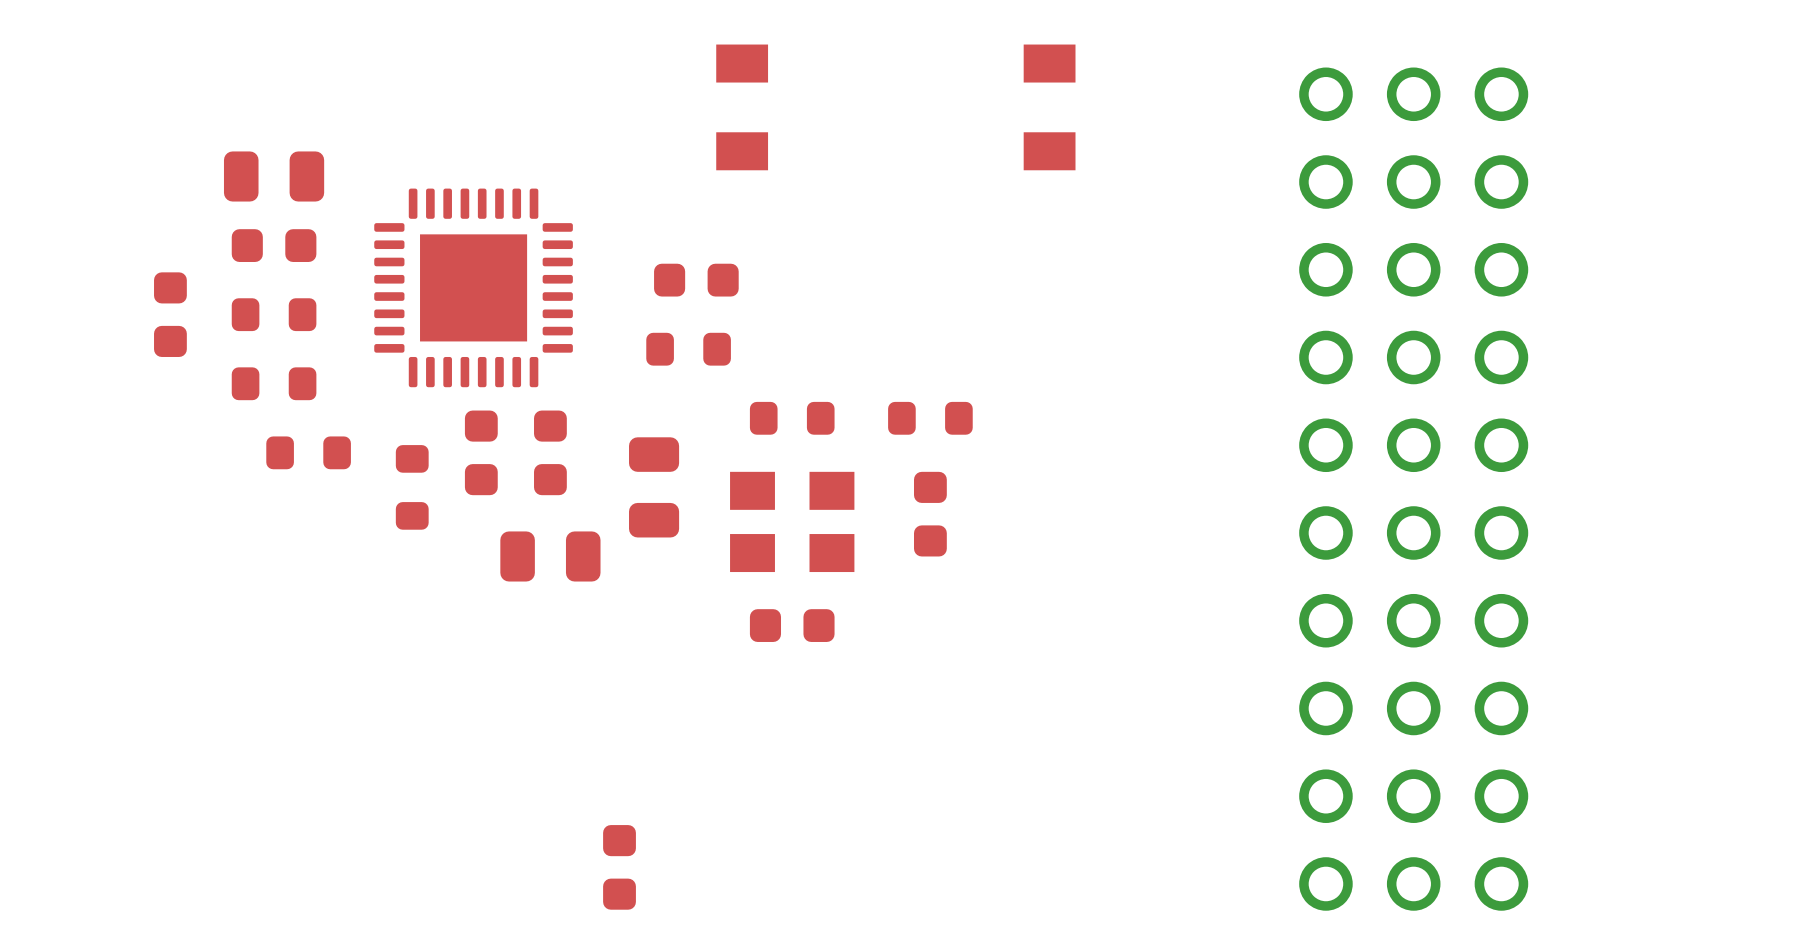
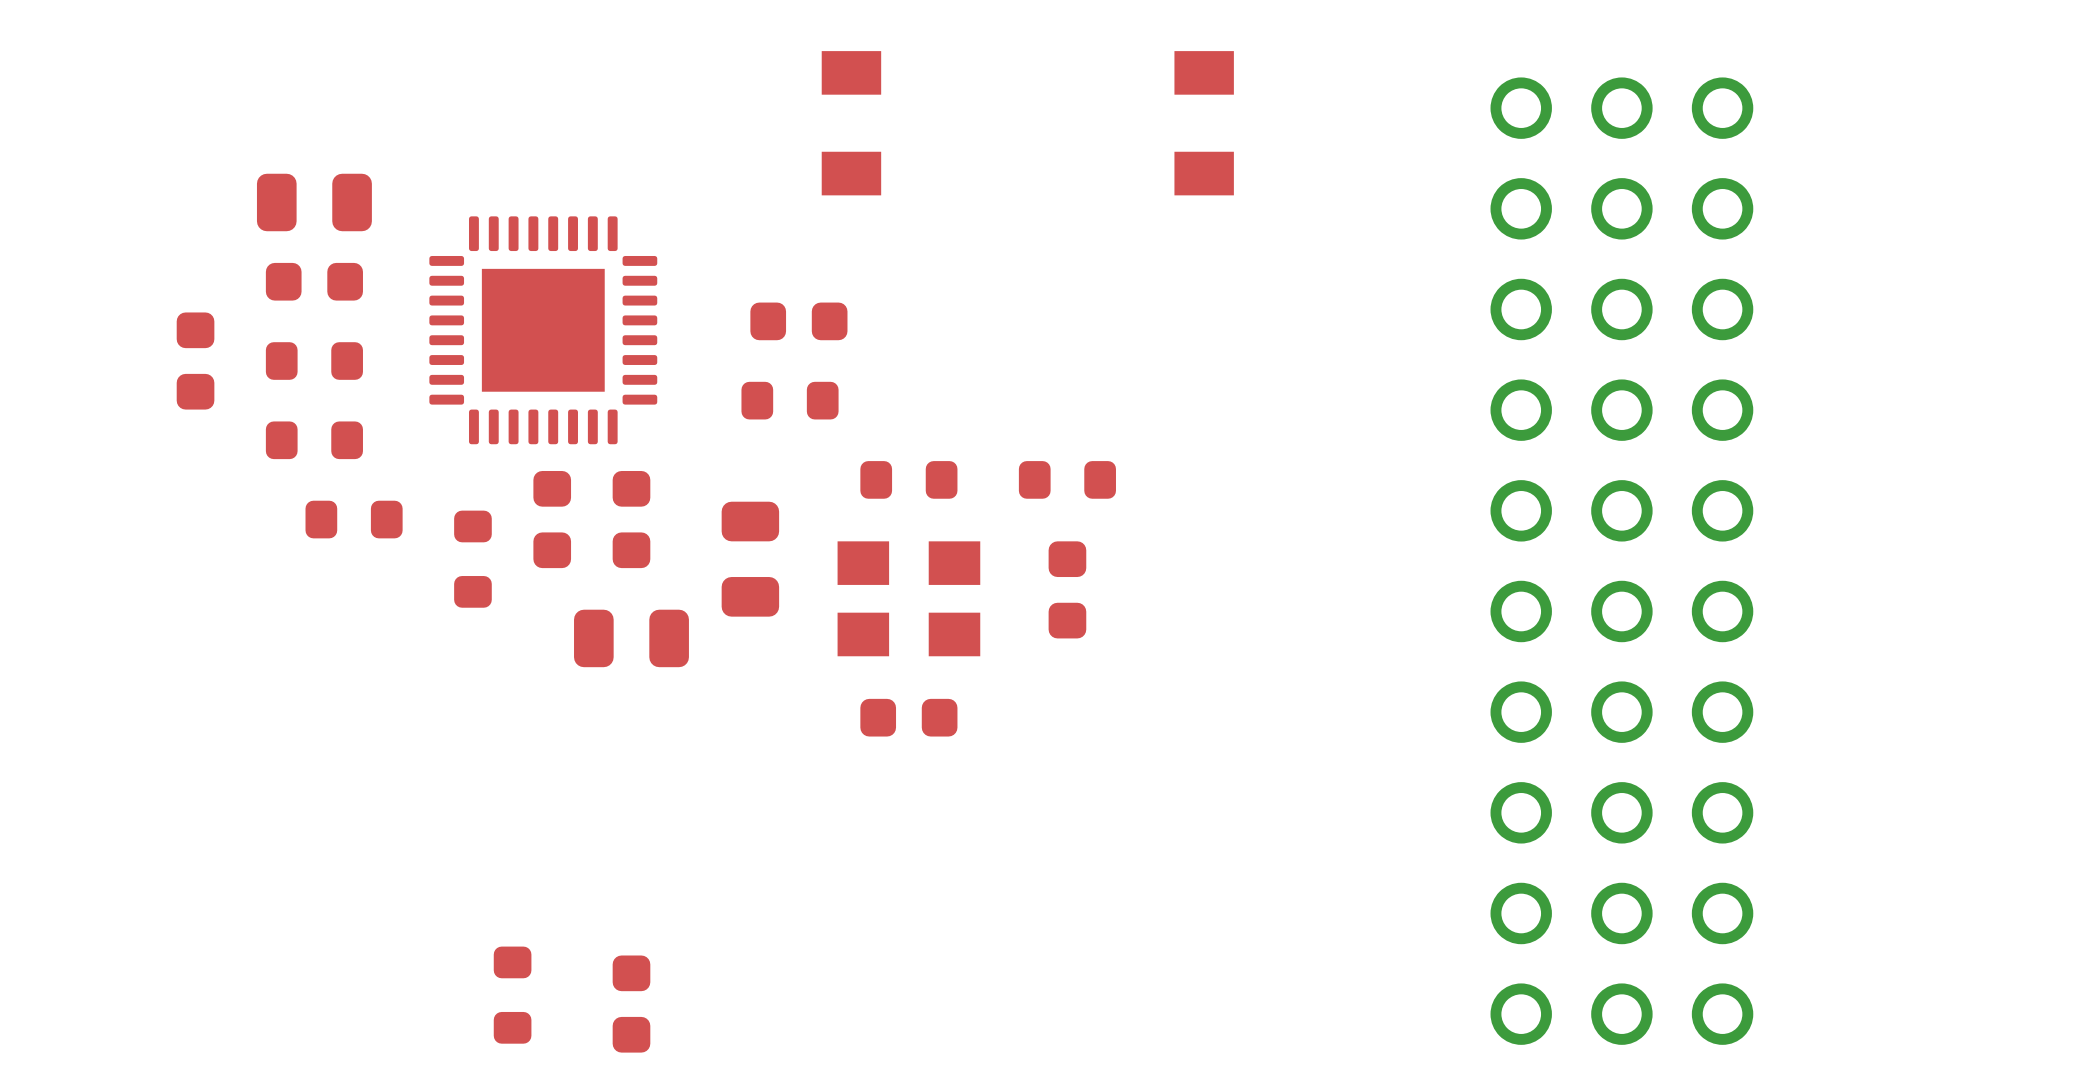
part: none -> (512, 995)
part position: (619, 867) -> (631, 1004)

